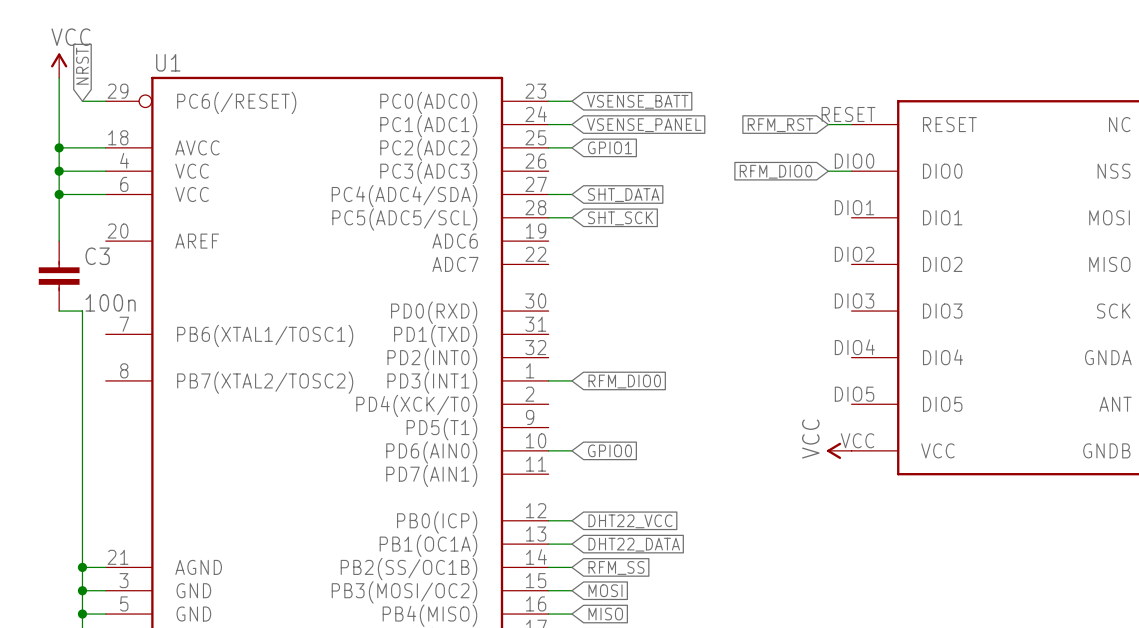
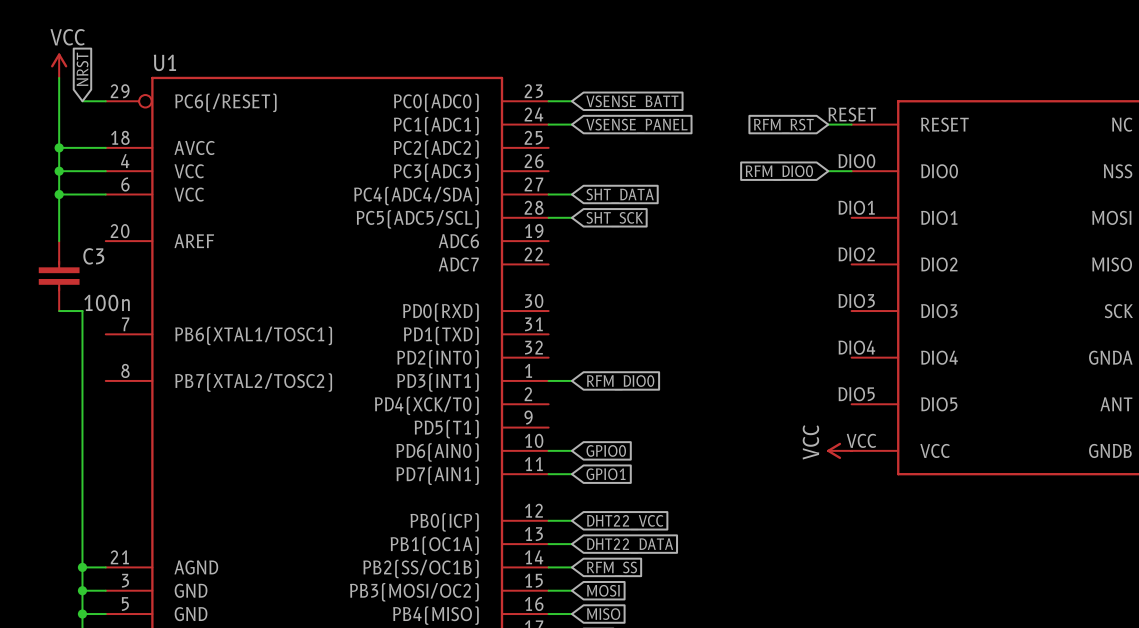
wire: (548, 147) (571, 147) -> none
global label: GPIO1 (609, 147) -> none
wire: none -> (548, 474) (571, 474)
global label: none -> GPIO1 (606, 474)

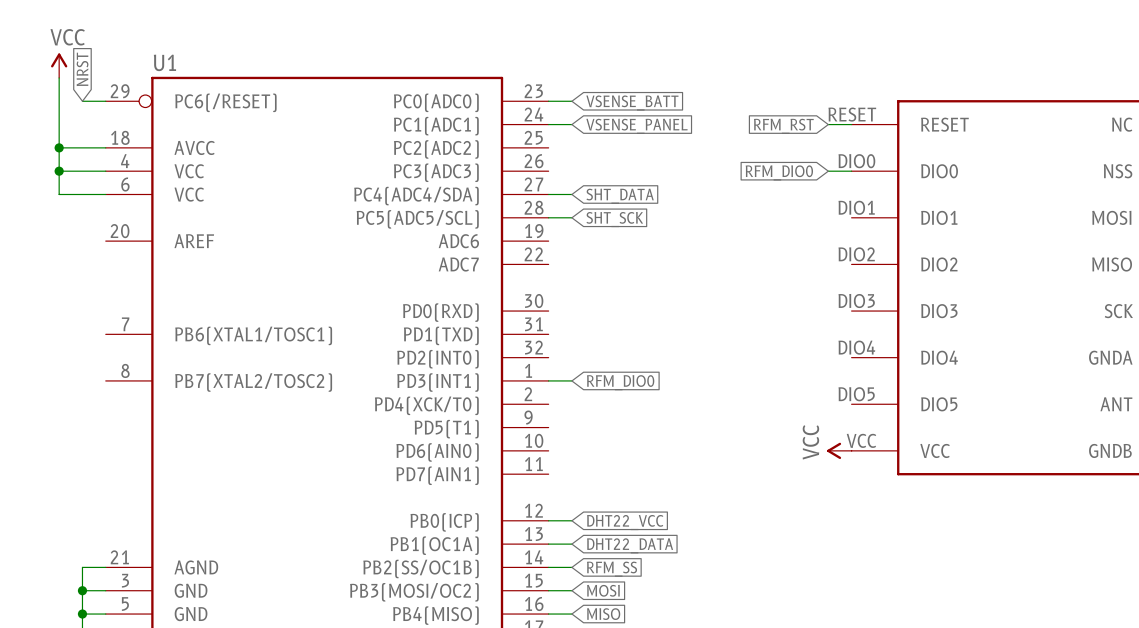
wire: (59, 194) (59, 241) -> none
junction: (59, 194) -> none
C3: 100n (59, 276) -> none
wire: (59, 311) (82, 311) (82, 567) -> none
wire: (548, 450) (571, 450) -> none
global label: GPIO0 (606, 450) -> none
wire: (548, 474) (571, 474) -> none
global label: GPIO1 (606, 474) -> none
junction: (82, 567) -> none

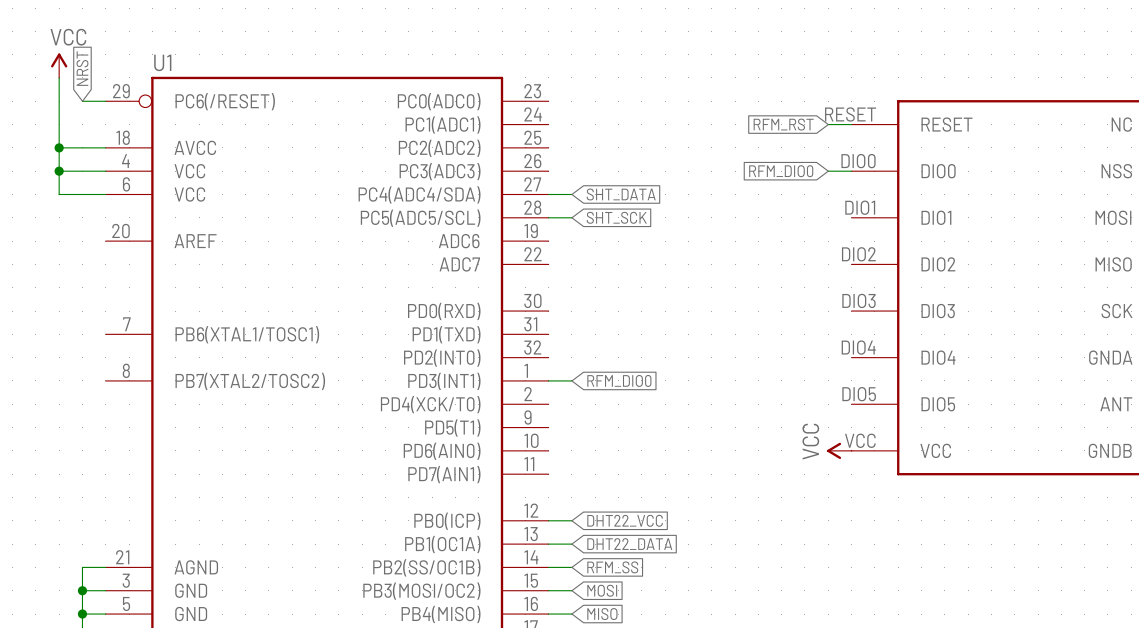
wire: (548, 101) (571, 101) -> none
global label: VSENSE_BATT (632, 103) -> none
wire: (548, 124) (571, 124) -> none
global label: VSENSE_PANEL (636, 126) -> none

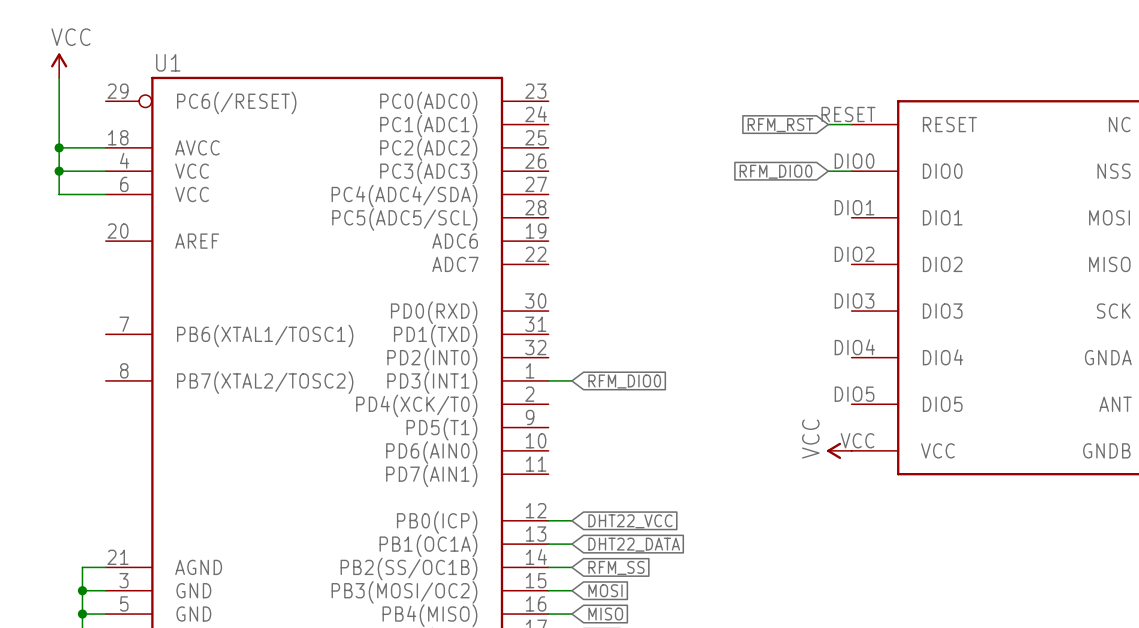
global label: NRST (82, 68) -> none
wire: (82, 101) (105, 101) -> none
wire: (548, 194) (571, 194) -> none
global label: SHT_DATA (621, 194) -> none
wire: (548, 217) (571, 217) -> none
global label: SHT_SCK (616, 217) -> none

